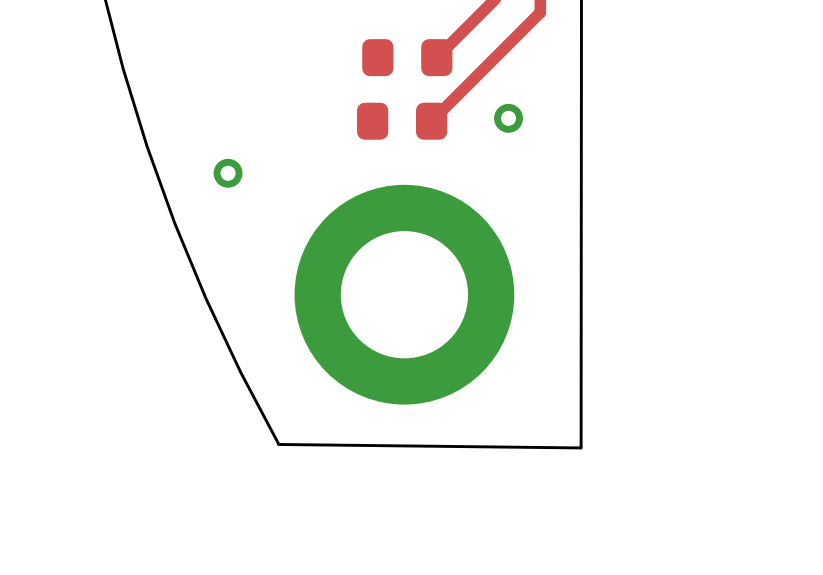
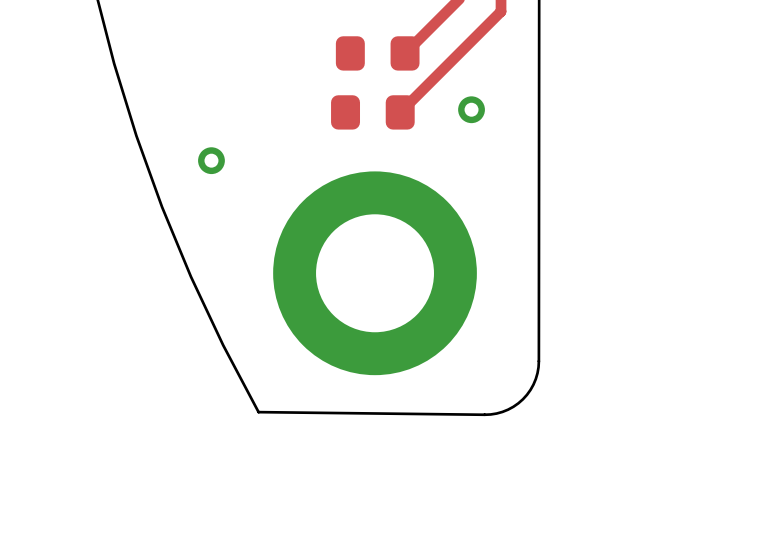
board edge: (581, 389) (581, 447) -> none
board edge: (278, 444) (580, 447) -> (258, 412) (496, 413) (513, 406) (527, 394) (535, 379) (538, 361)

